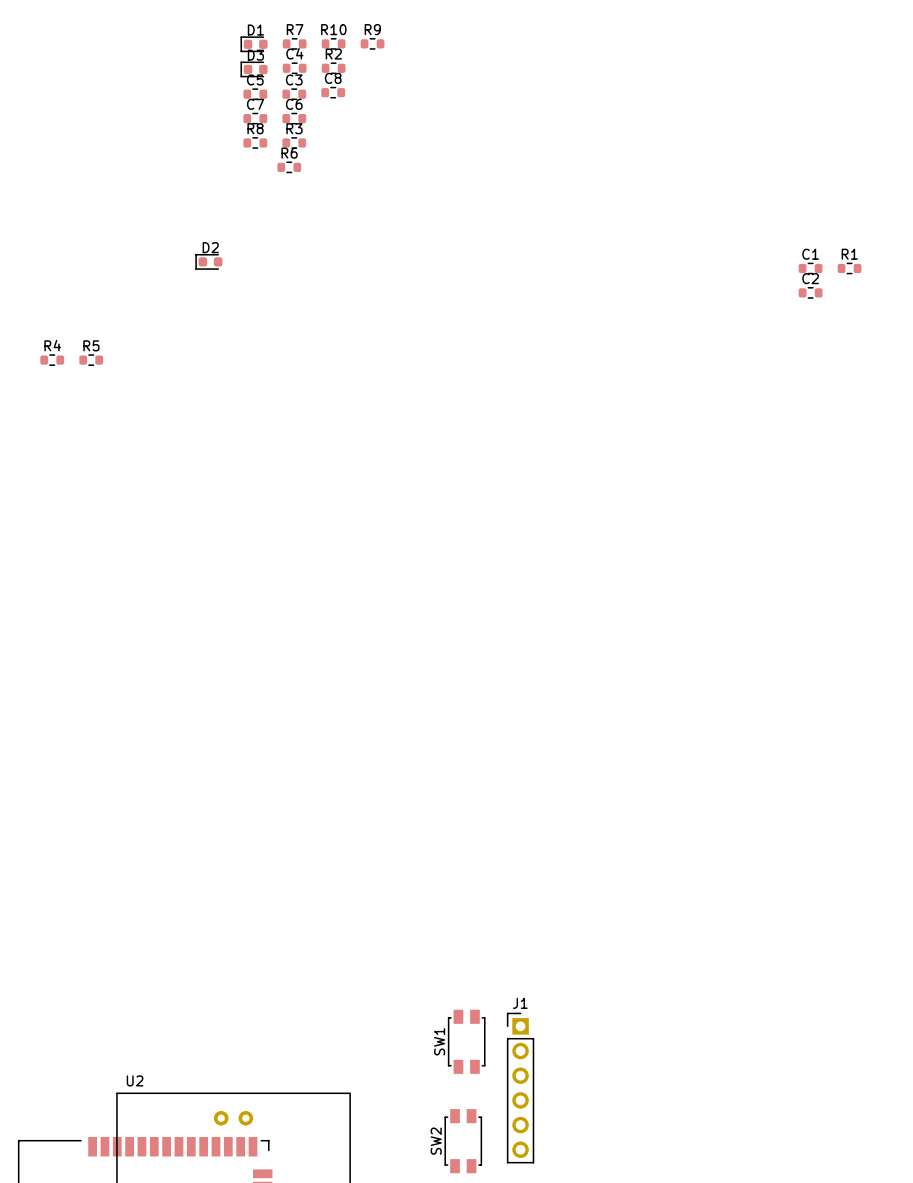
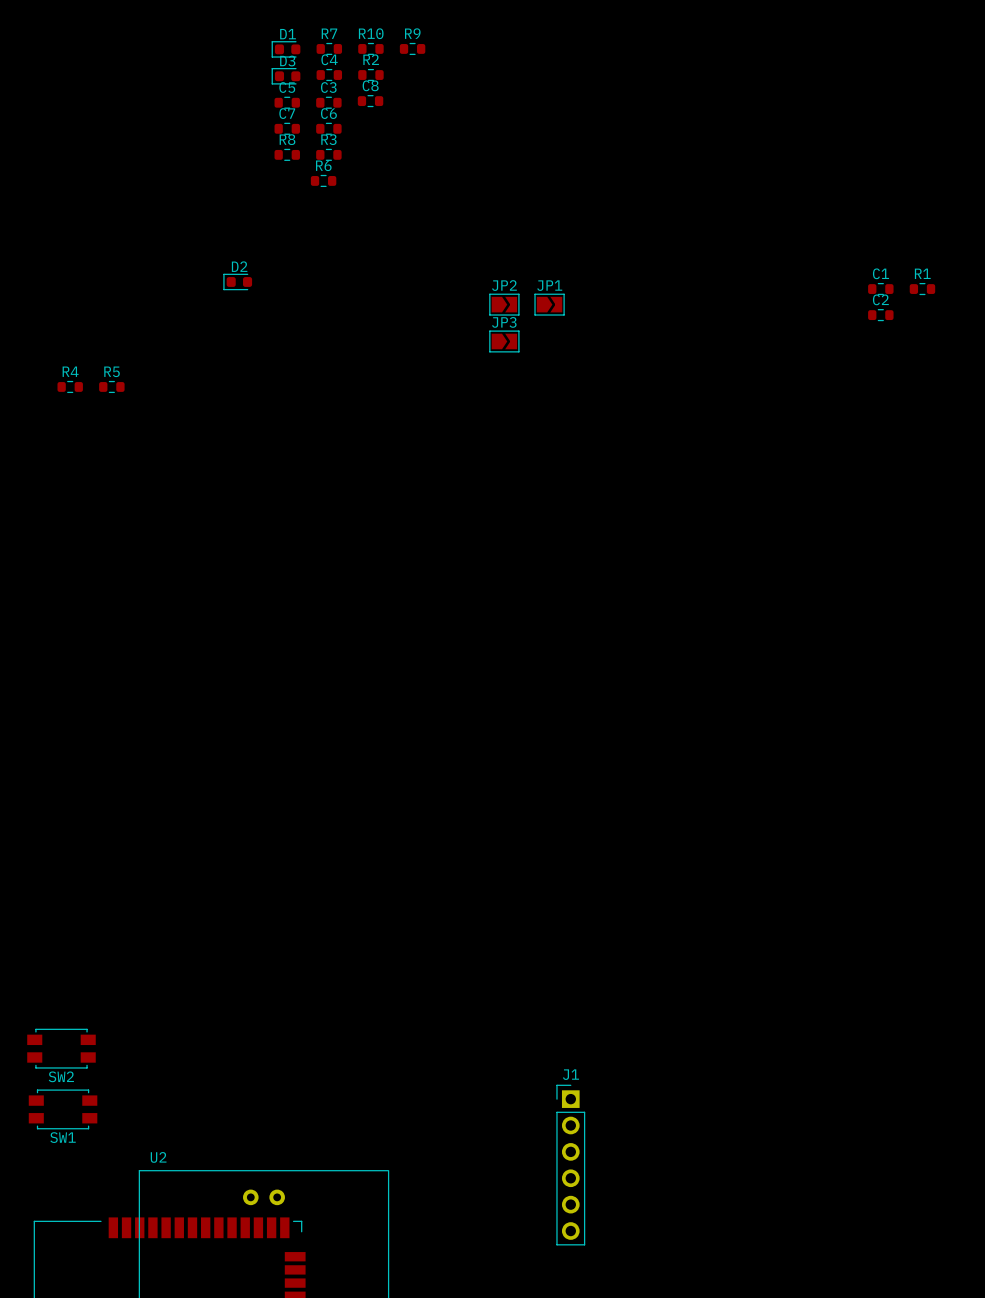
JP2: none -> (504, 304)
JP1: none -> (549, 304)
JP3: none -> (504, 341)
SW1 name position: SW1 (439, 1041) -> SW1 (63, 1137)
SW1 rotation: 0° (466, 1041) -> 90° clockwise (63, 1109)
SW1 position: (466, 1041) -> (63, 1109)
SW2 name position: SW2 (436, 1141) -> SW2 (61, 1076)
SW2 rotation: 0° (463, 1141) -> 90° clockwise (61, 1048)
SW2 position: (463, 1141) -> (61, 1048)

